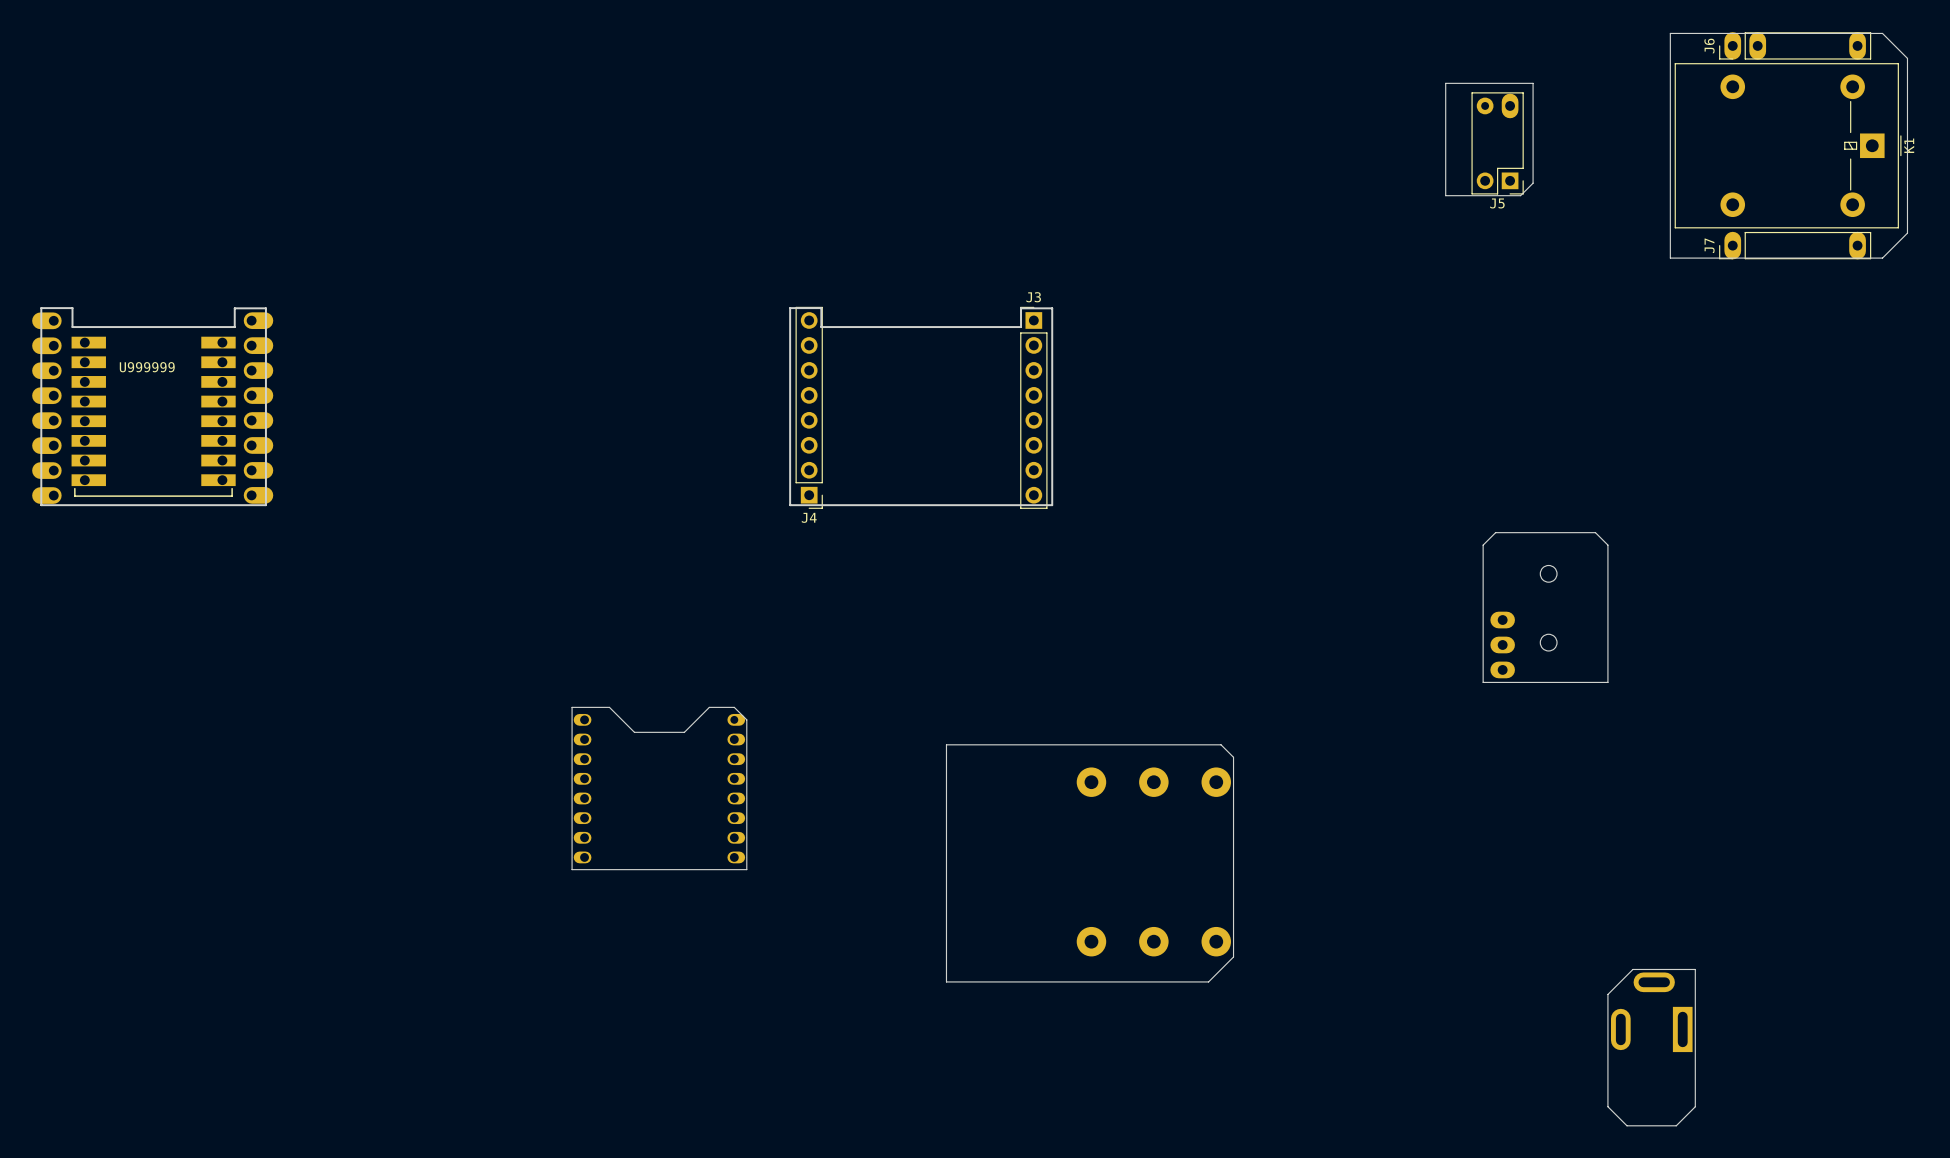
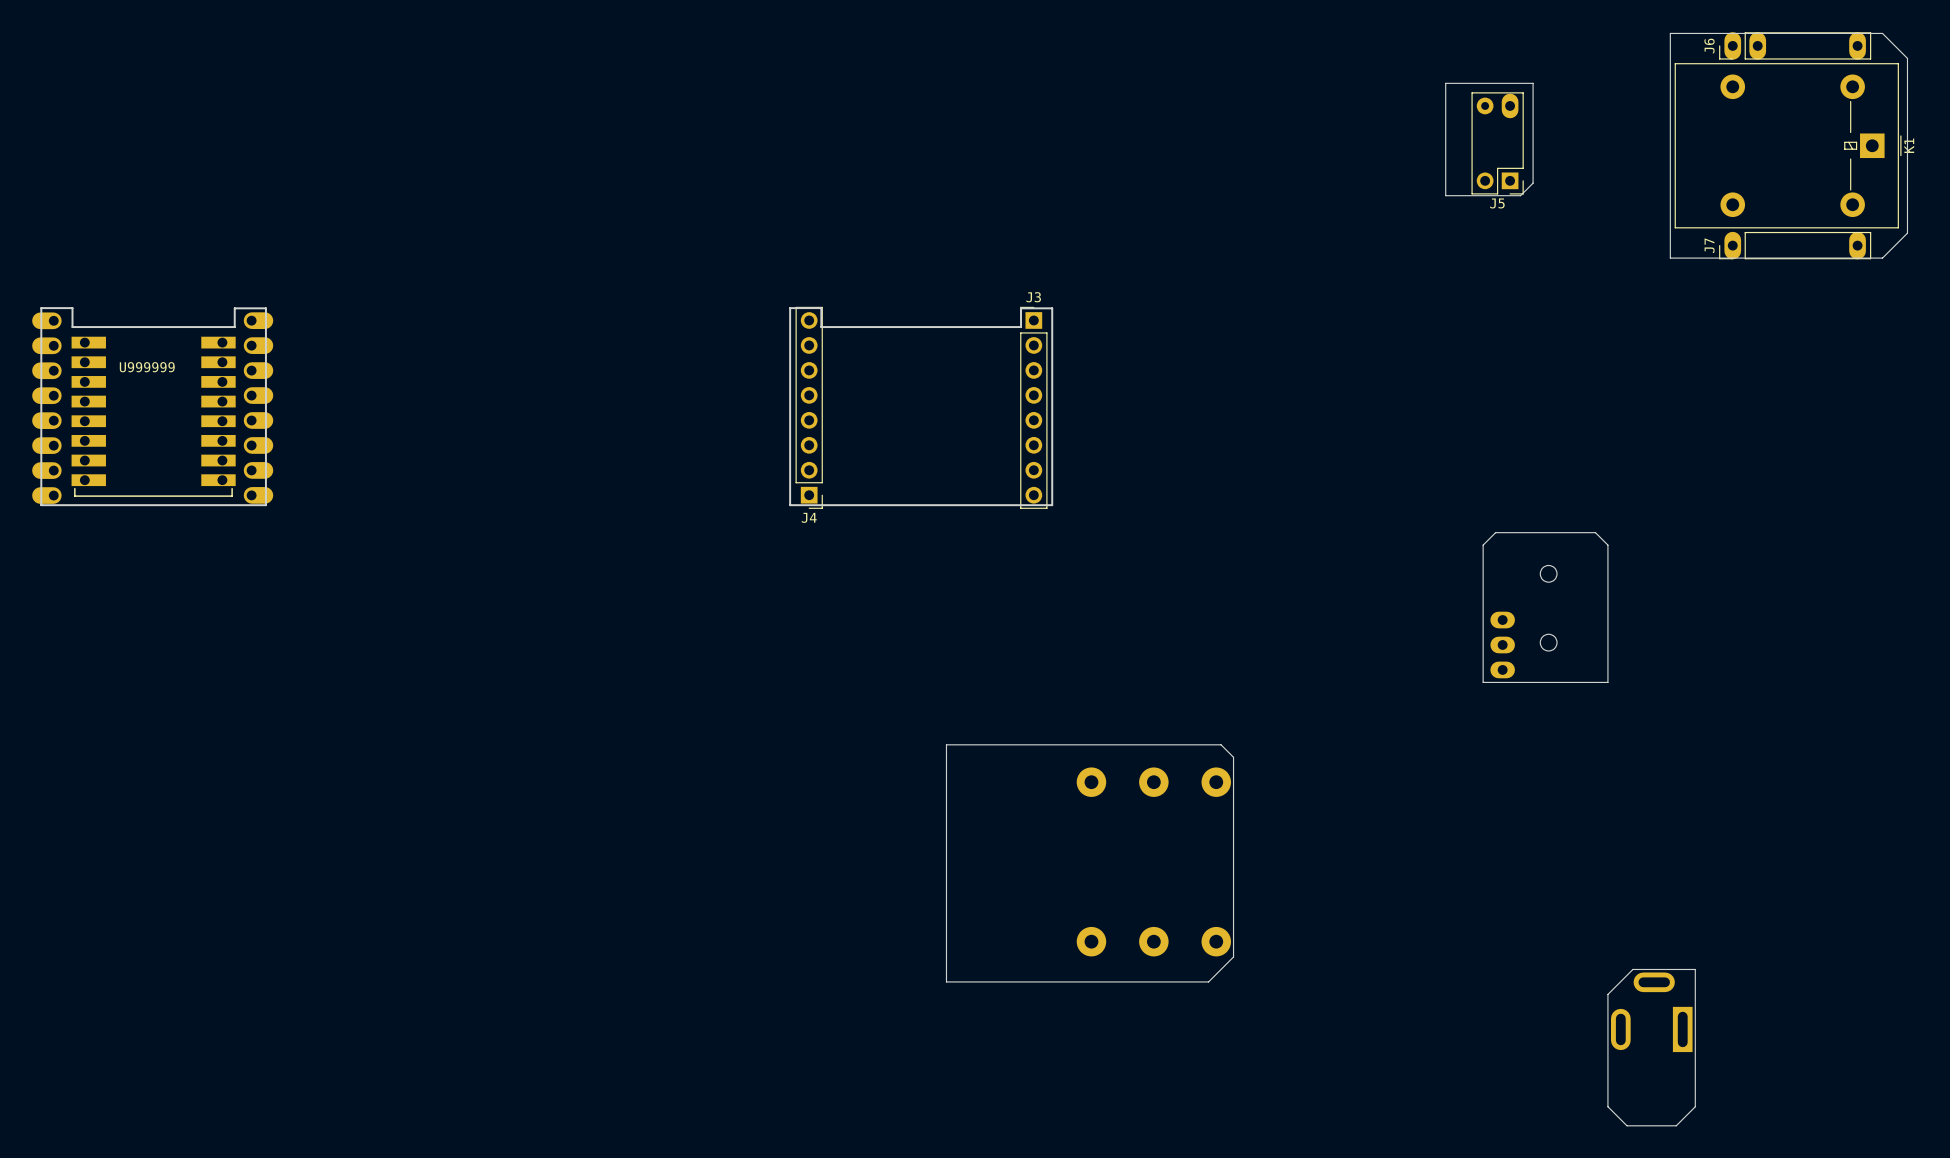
board edge: (572, 707) (572, 869) (746, 869) (746, 719) (734, 707) (709, 707) (684, 732) (634, 732) (609, 707) (572, 707) -> none
part: (582, 788) -> none
part: (736, 788) -> none

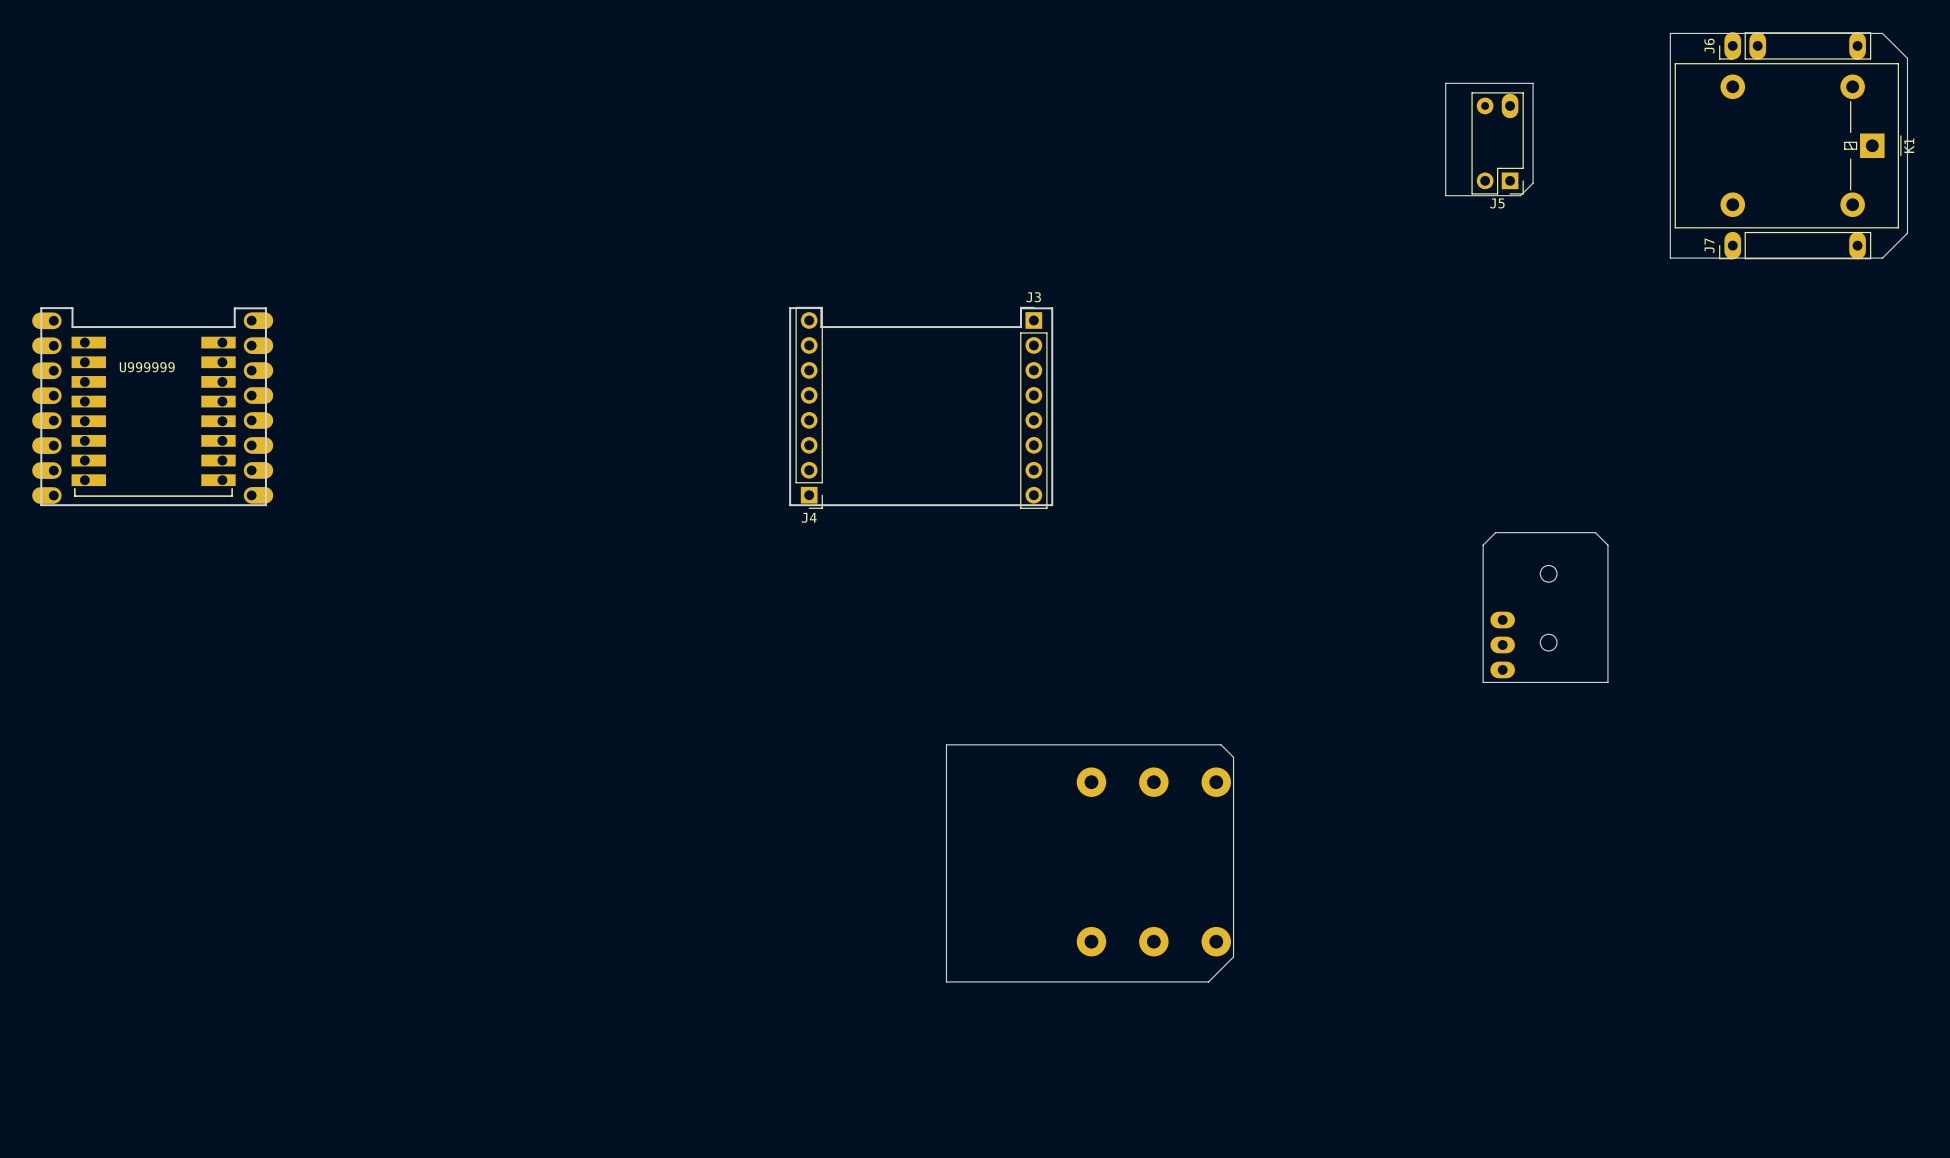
board edge: (1632, 969) (1695, 969) (1695, 1106) (1676, 1125) (1626, 1125) (1607, 1106) (1607, 994) (1632, 969) -> none
part: (1651, 1012) -> none

